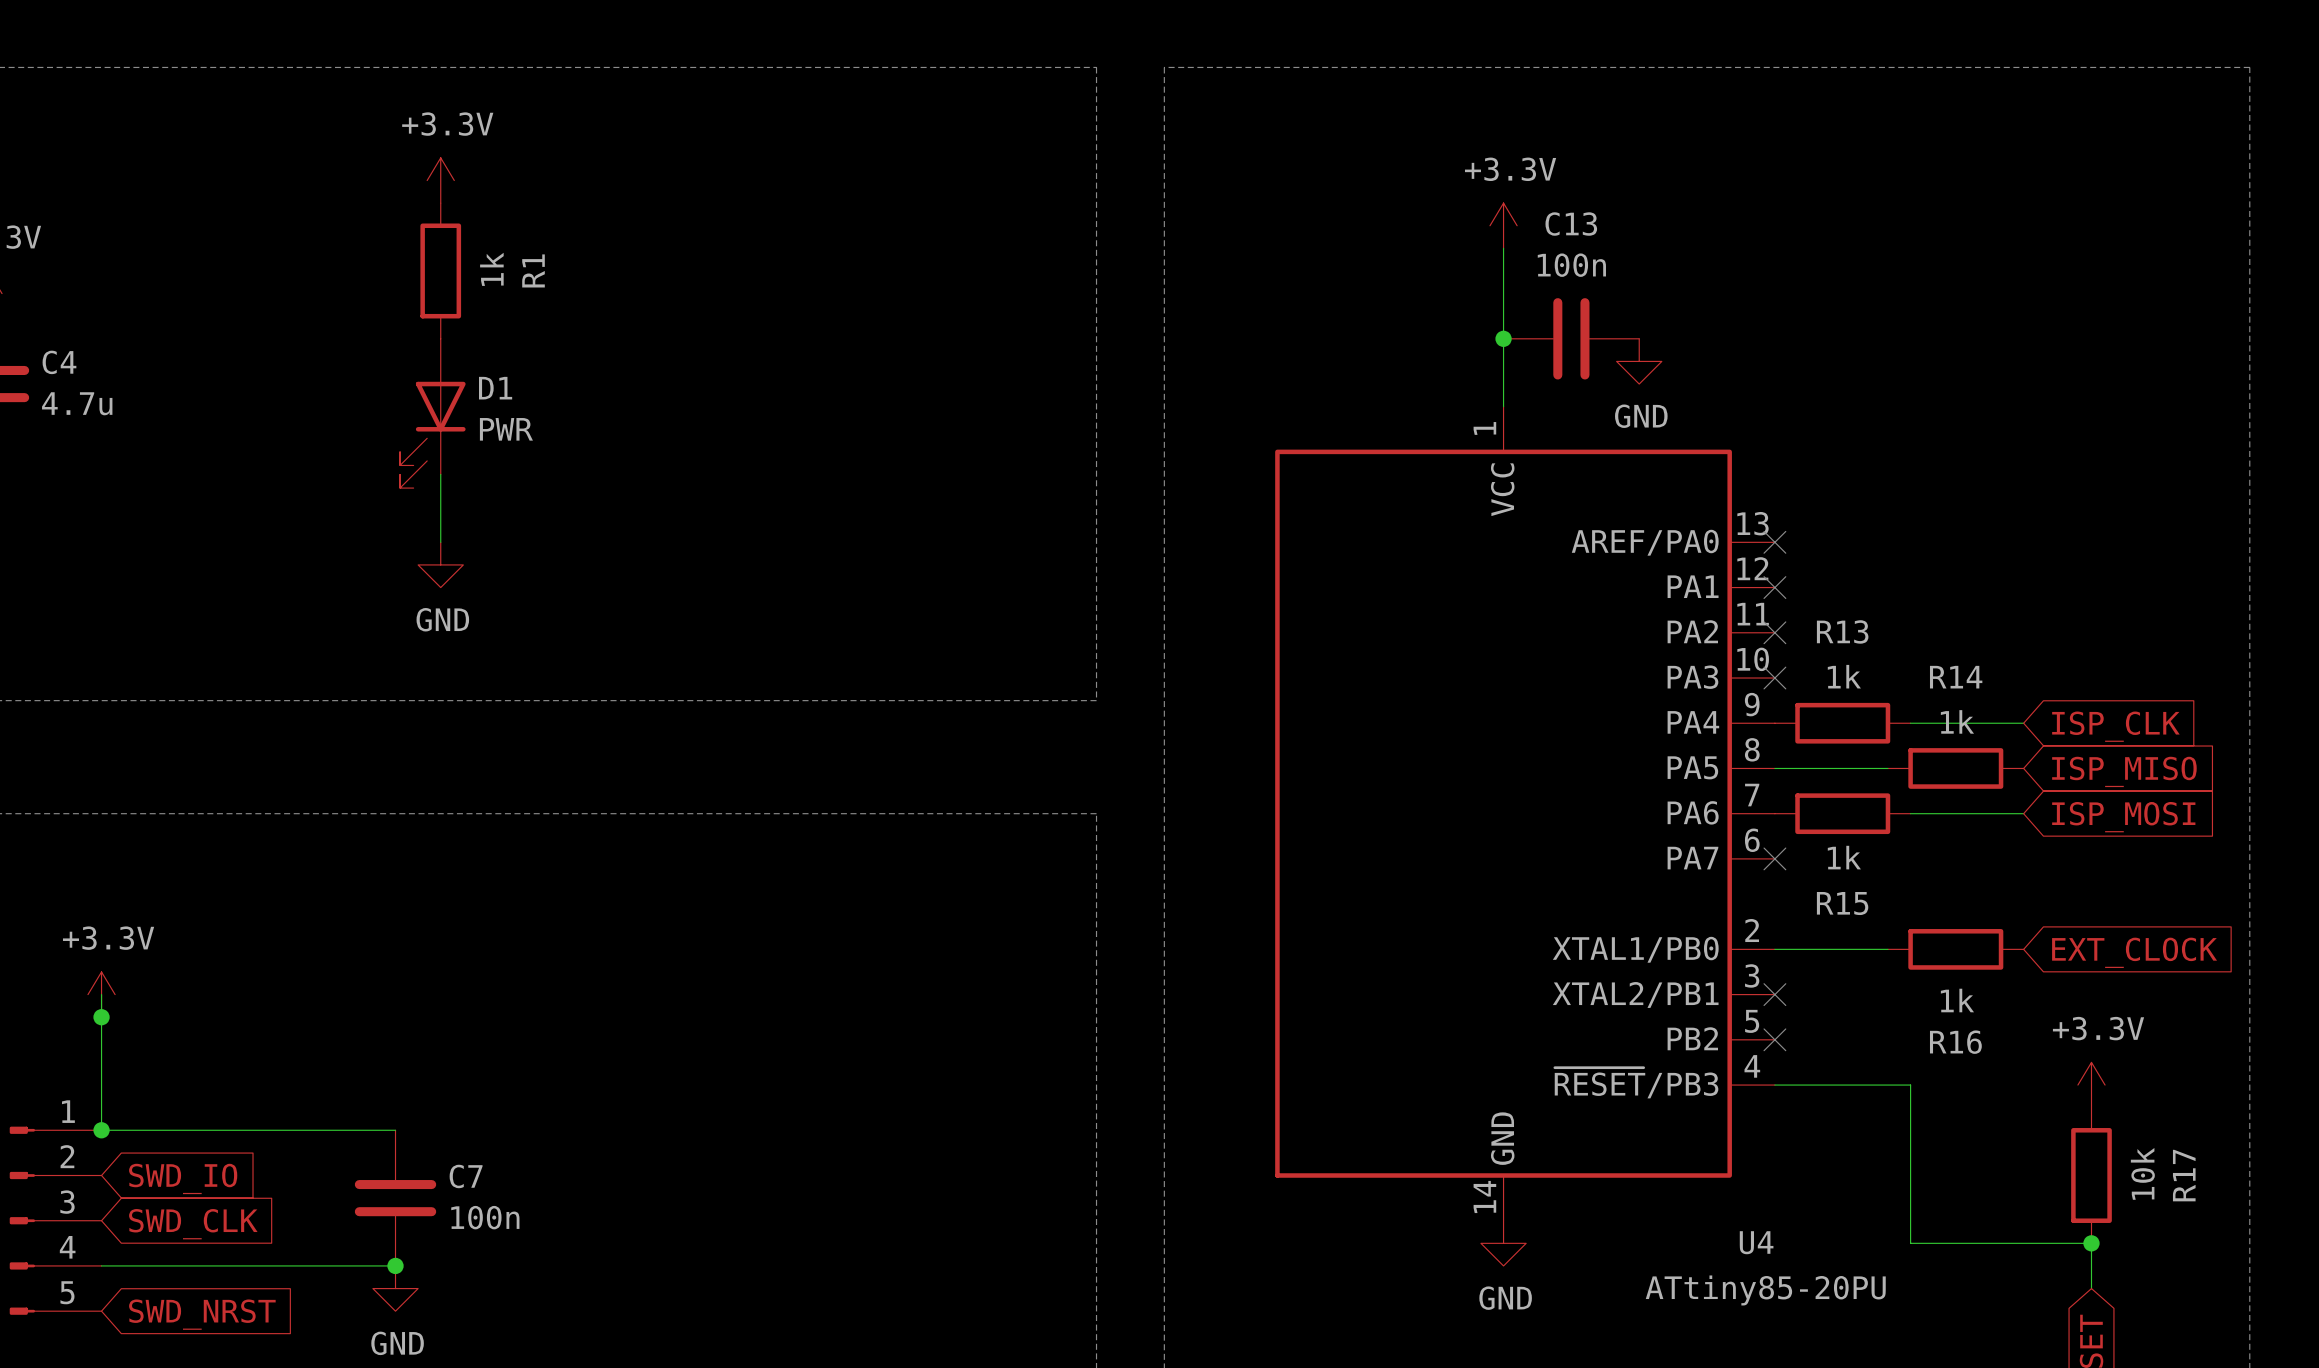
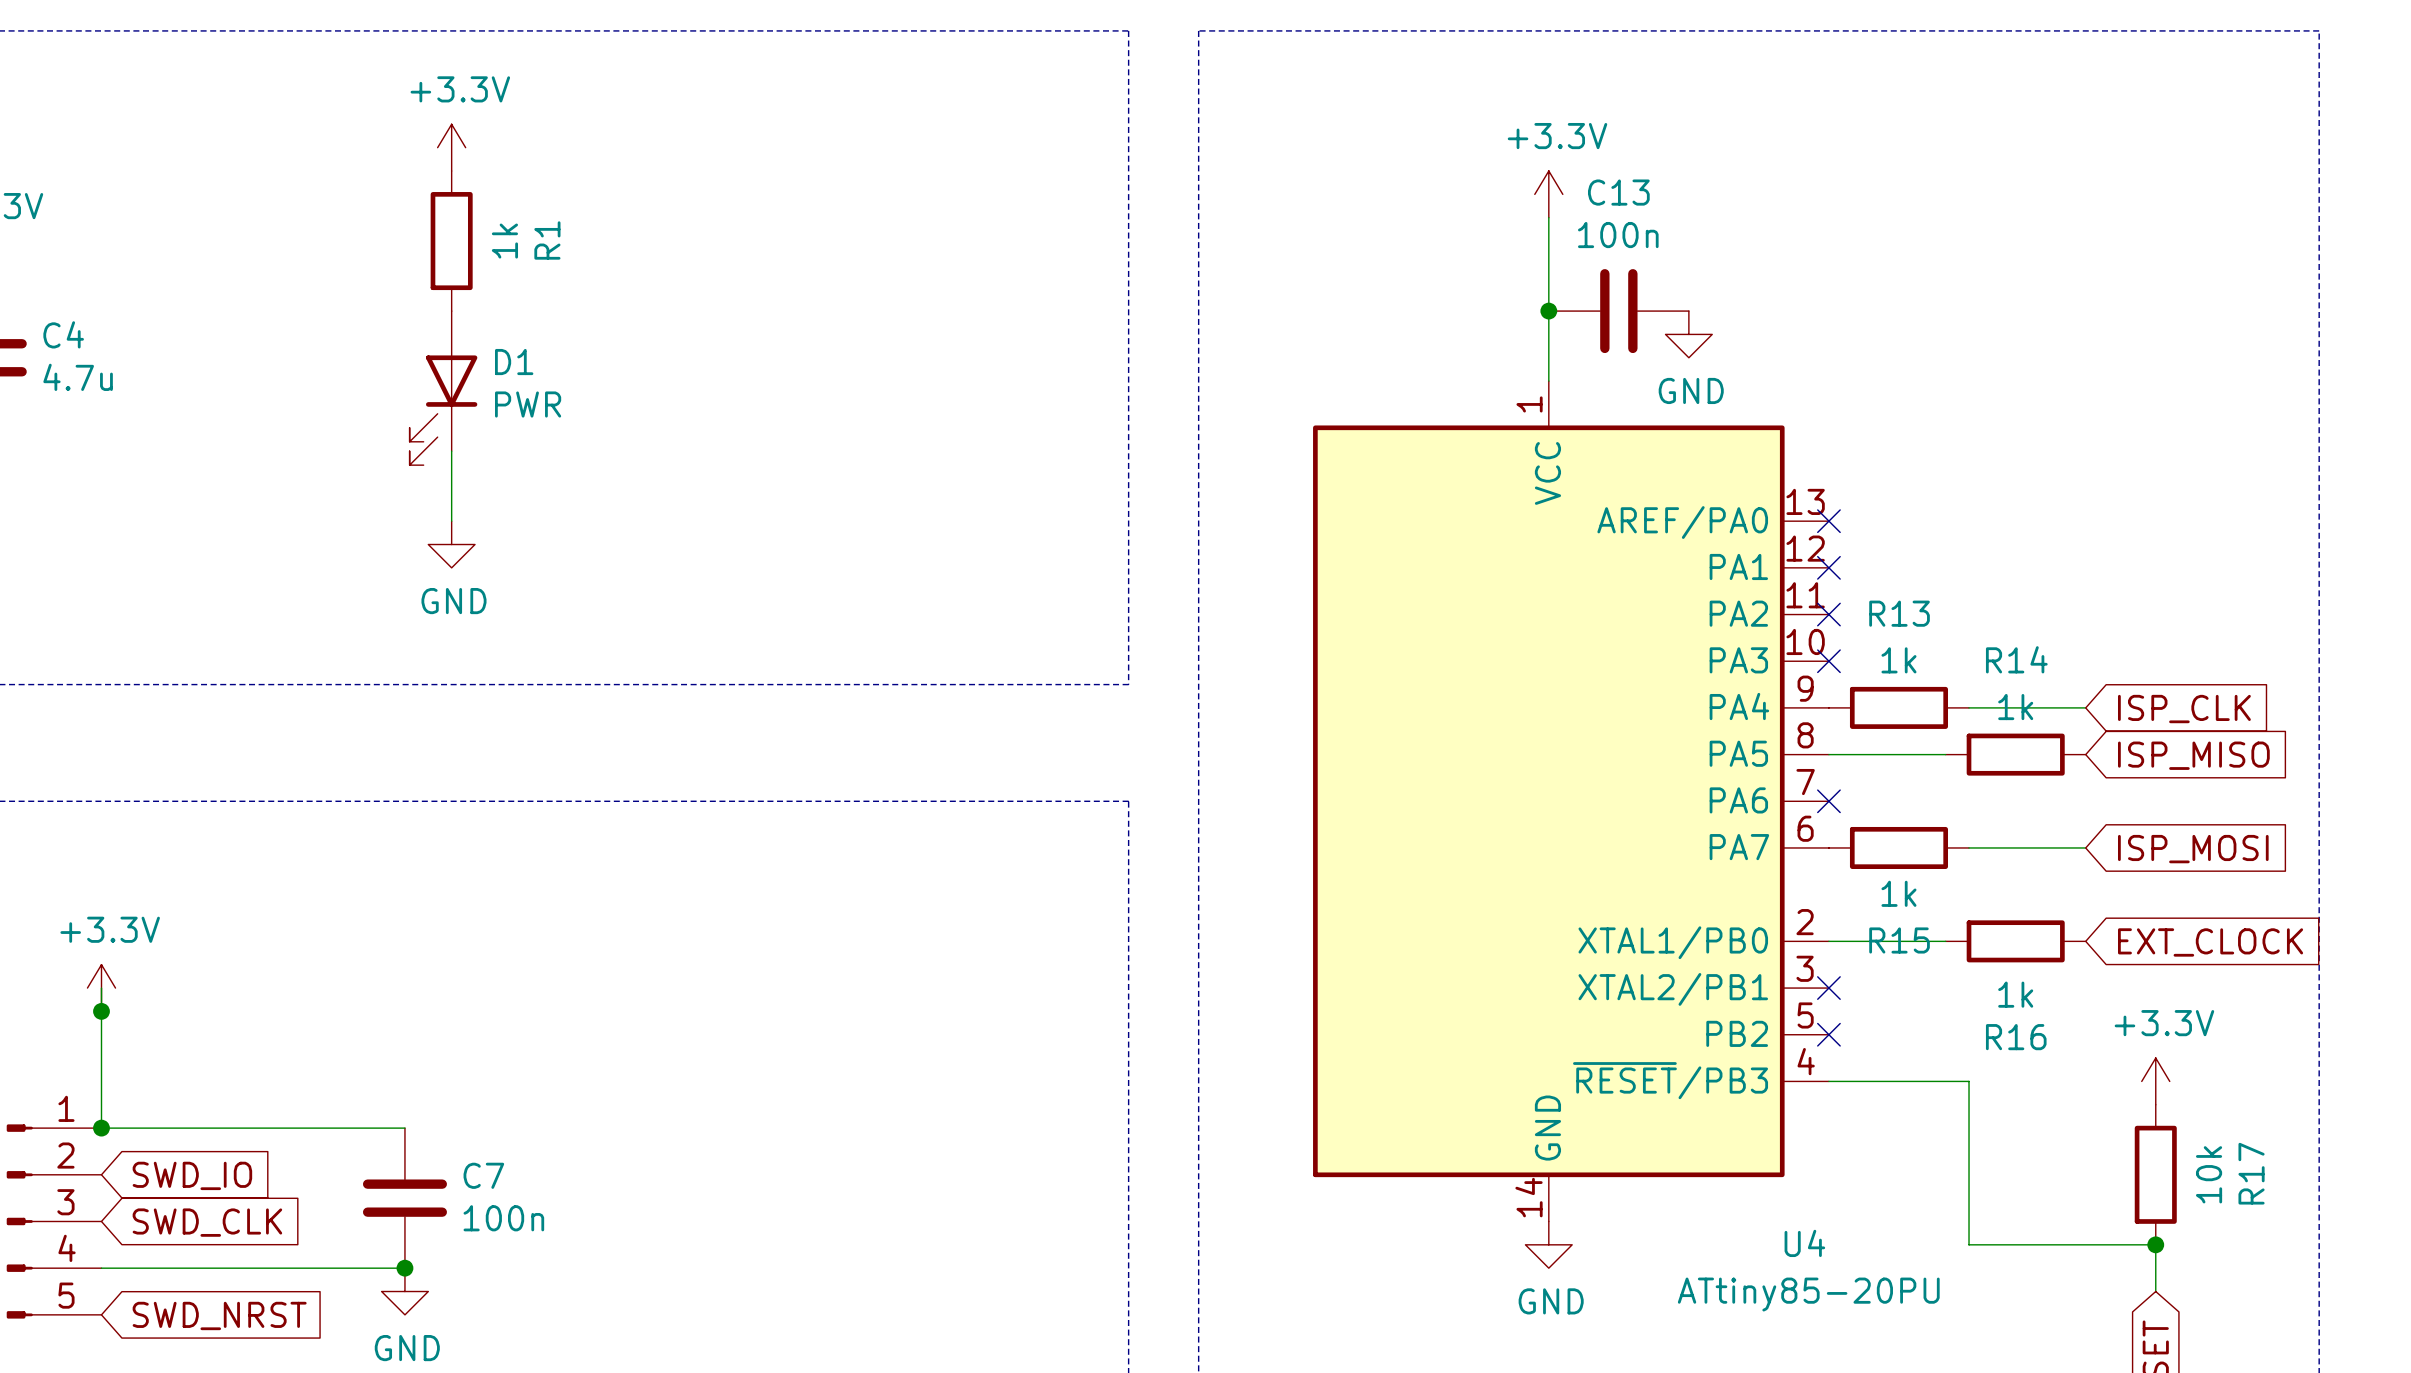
R15 position: (1842, 813) -> (1898, 847)
wire: (1910, 813) (2023, 813) -> (1969, 847) (2085, 847)
global label position: ISP_MOSI (2123, 817) -> ISP_MOSI (2193, 849)
no-connect mark position: (1774, 858) -> (1828, 801)

